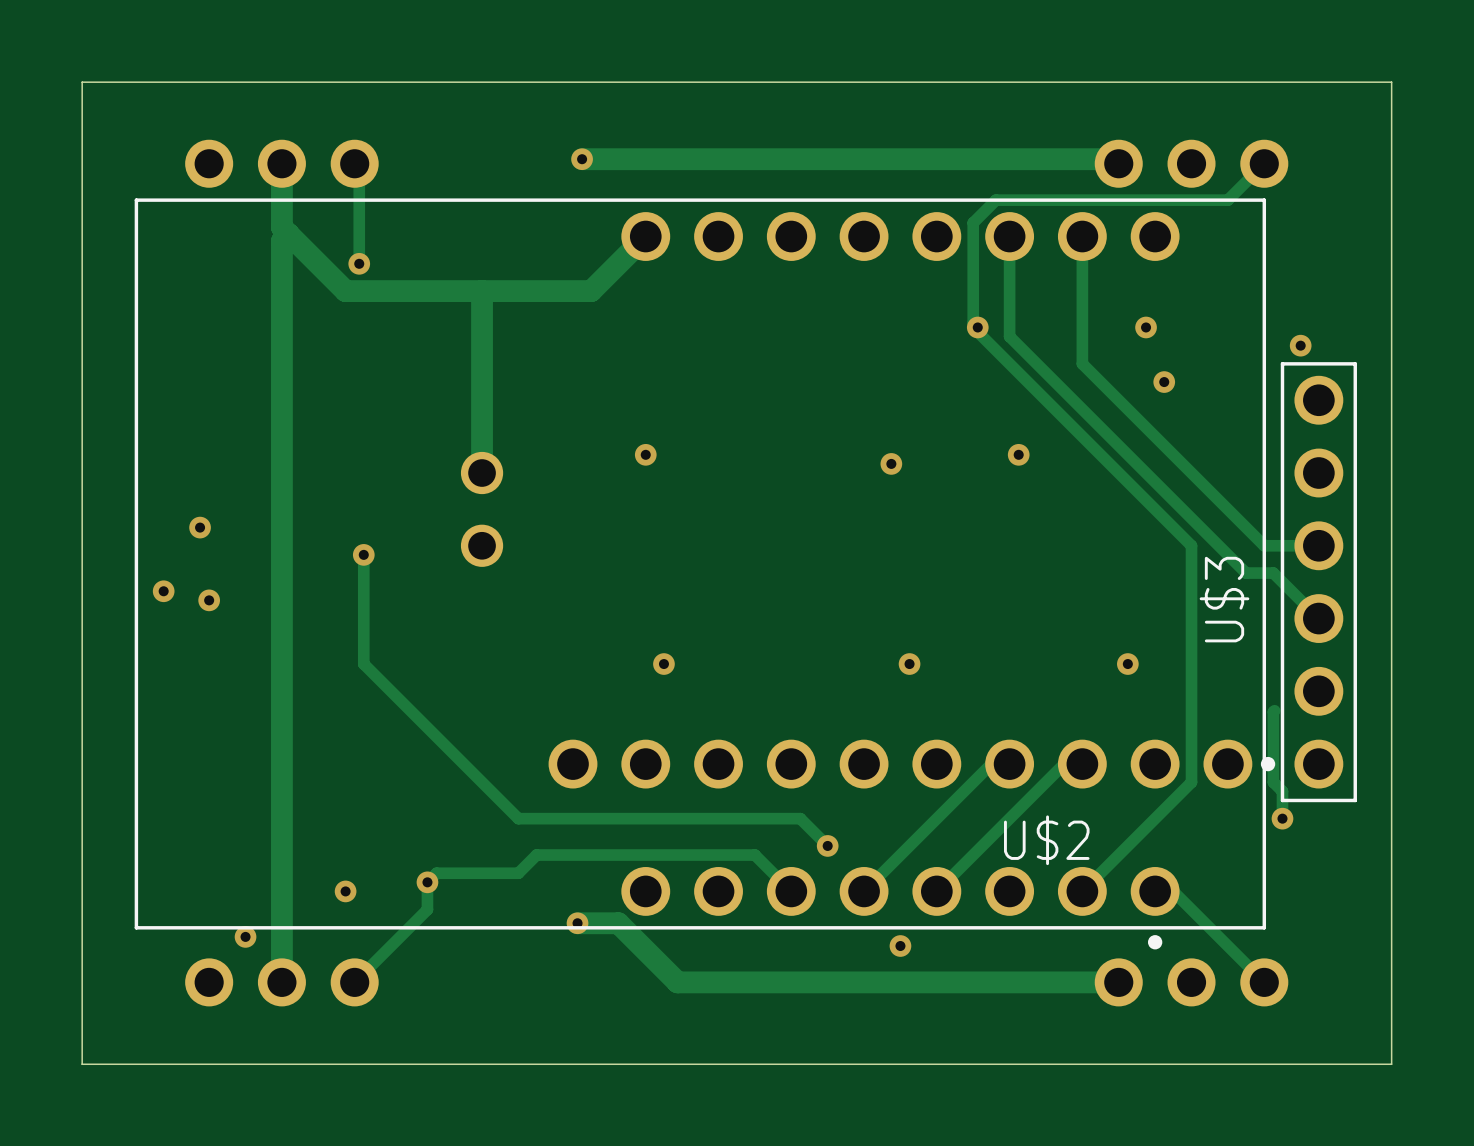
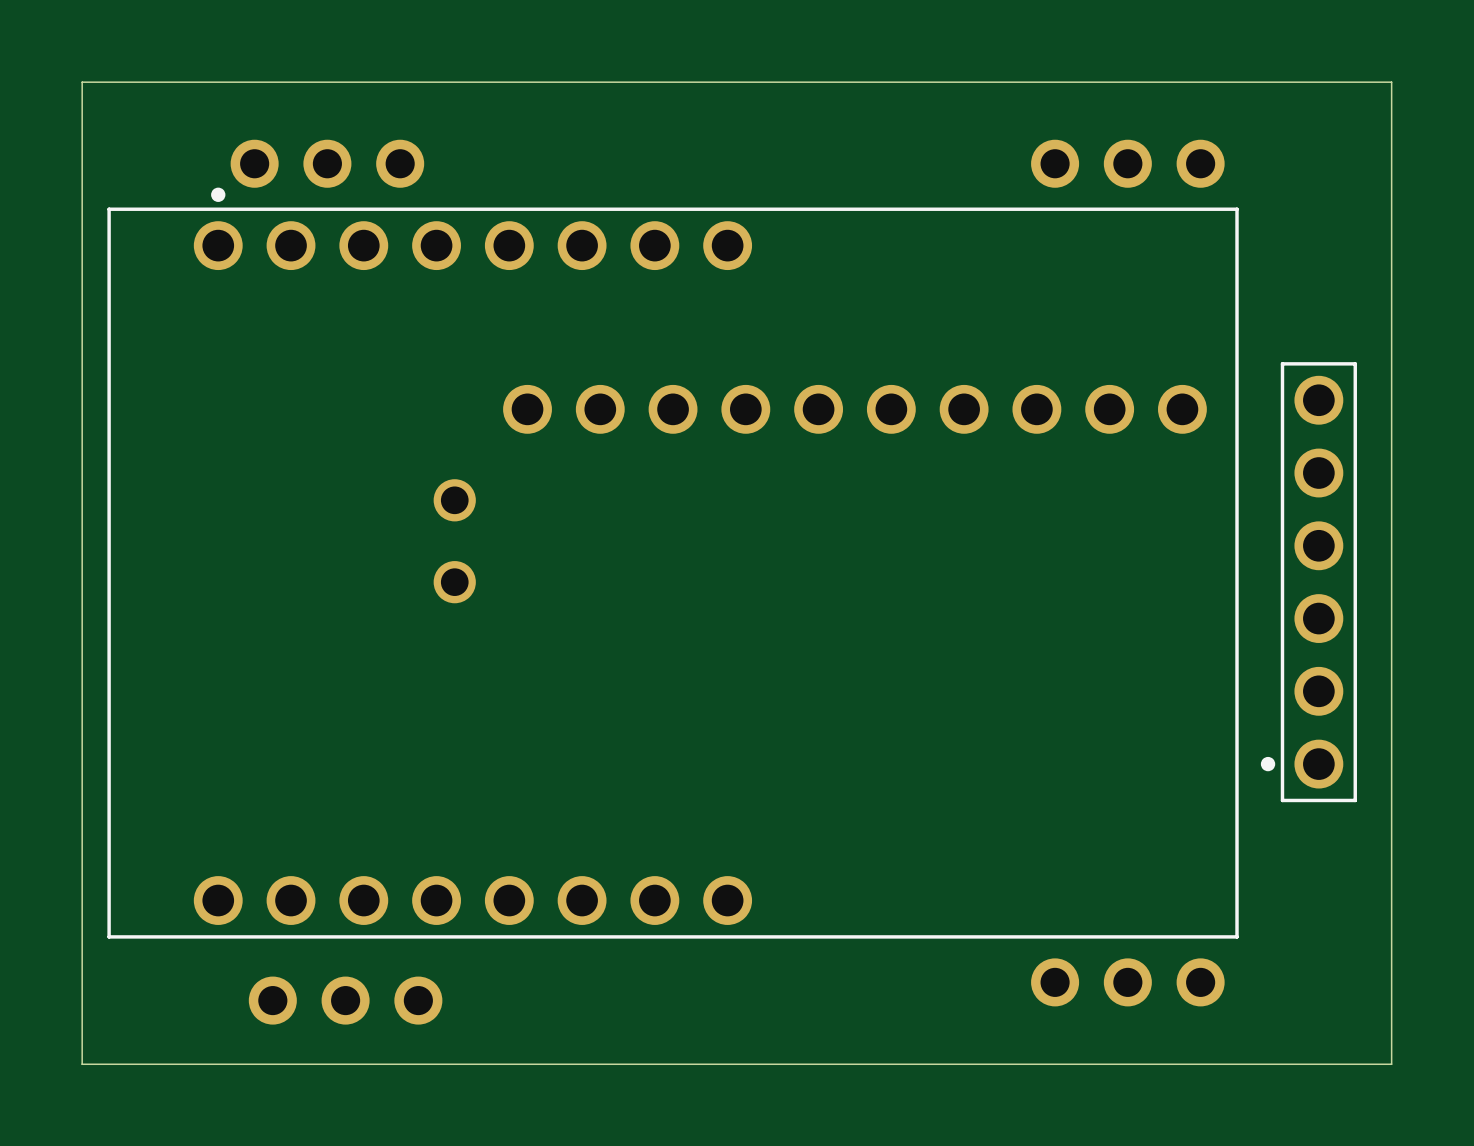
track: (582, 159) (1114, 159) (1118, 163) -> none
via: (582, 159) -> none
track: (281, 163) (281, 227) (345, 291) (591, 291) (645, 236) -> none
part position: (281, 163) -> (327, 163)
track: (354, 163) (359, 168) (359, 263) -> none
part position: (1191, 163) -> (1127, 163)
track: (1264, 163) (1227, 200) (995, 200) (973, 222) (973, 322) (977, 327) (977, 332) (1191, 545) (1191, 782) (1082, 891) -> none
track: (288, 234) (281, 241) (281, 982) -> none
track: (1009, 236) (1009, 336) (1246, 573) (1273, 573) (1318, 618) -> none
track: (1082, 236) (1082, 363) (1264, 545) (1318, 545) -> none
via: (359, 263) -> none
track: (482, 291) (482, 473) -> none
via: (977, 327) -> none
via: (1146, 327) -> none
via: (1300, 345) -> none
via: (1164, 382) -> none
via: (645, 454) -> none
via: (1018, 454) -> none
via: (891, 463) -> none
part: (482, 473) -> none
part: none -> (454, 500)
via: (200, 527) -> none
part: (482, 545) -> none
track: (363, 554) (363, 664) (518, 818) (800, 818) (827, 845) -> none
via: (363, 554) -> none
part: none -> (673, 563)
U$2: (700, 573) -> none
part: none -> (454, 582)
via: (163, 591) -> none
U$3 name: U$3 (1224, 599) -> none
via: (209, 600) -> none
via: (663, 664) -> none
via: (909, 664) -> none
via: (1127, 664) -> none
track: (1274, 710) (1273, 782) (1282, 791) (1282, 818) -> none
part position: (900, 764) -> (854, 409)
track: (1009, 764) (991, 764) (864, 891) -> none
track: (1082, 764) (1064, 764) (936, 891) -> none
via: (1282, 818) -> none
via: (827, 845) -> none
via: (427, 882) -> none
via: (345, 891) -> none
track: (791, 891) (754, 855) (536, 855) (518, 873) (436, 873) (427, 882) (427, 909) (354, 982) -> none
track: (1155, 891) (1173, 891) (1264, 982) -> none
track: (577, 923) (618, 923) (677, 982) (1118, 982) -> none
via: (577, 923) -> none
via: (245, 936) -> none
via: (900, 946) -> none
part position: (281, 982) -> (345, 1000)
part position: (1191, 982) -> (1127, 982)

